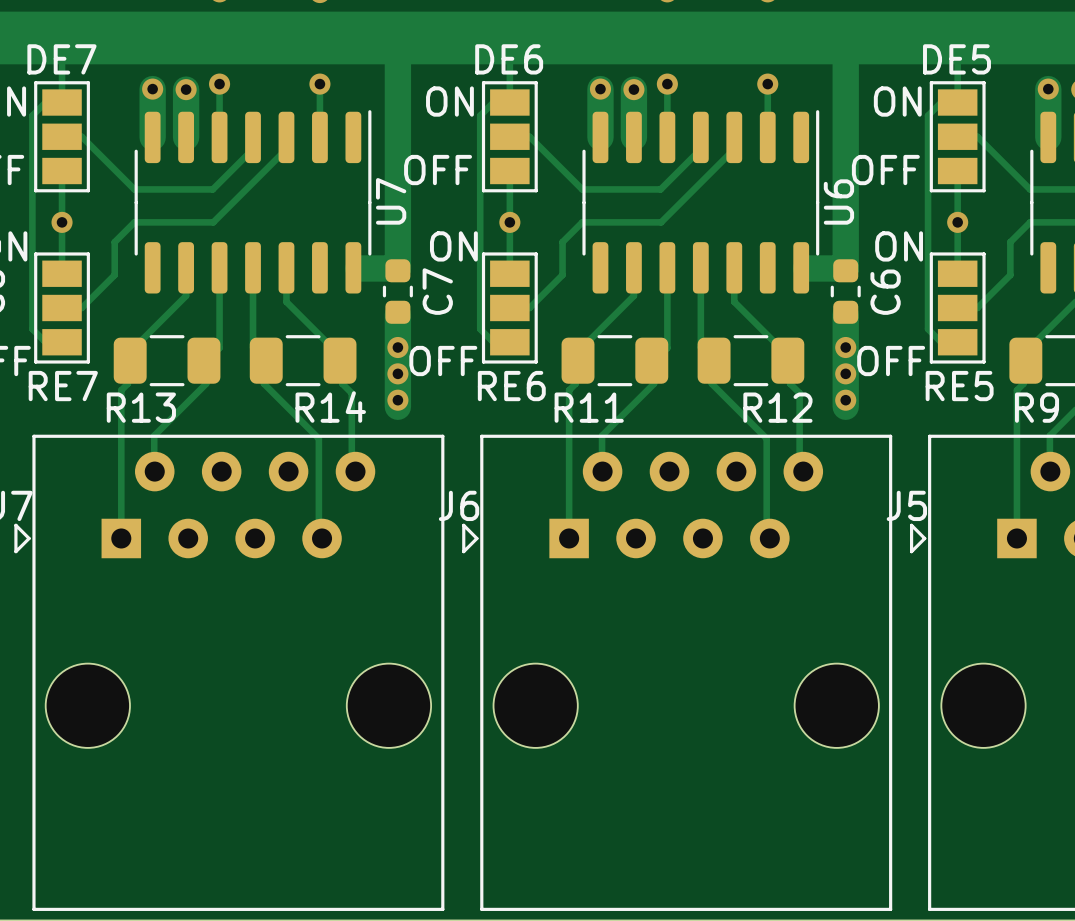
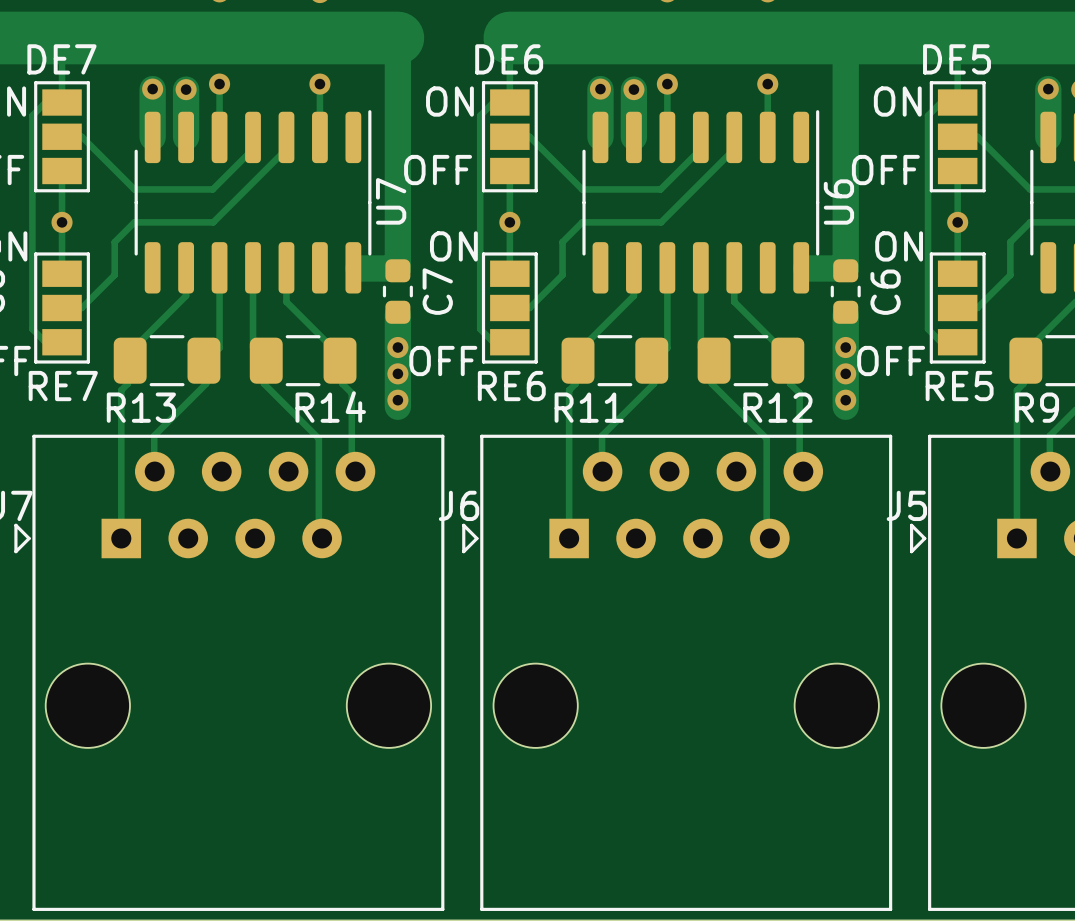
track: (397, 37) (509, 37) -> none

